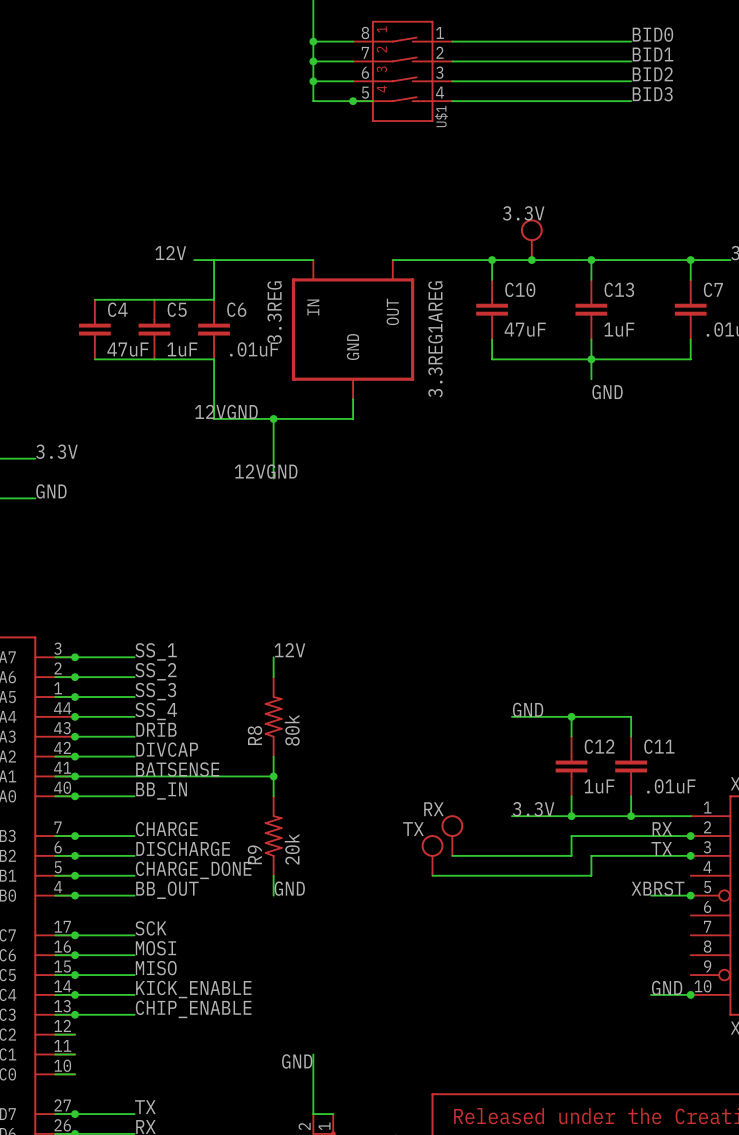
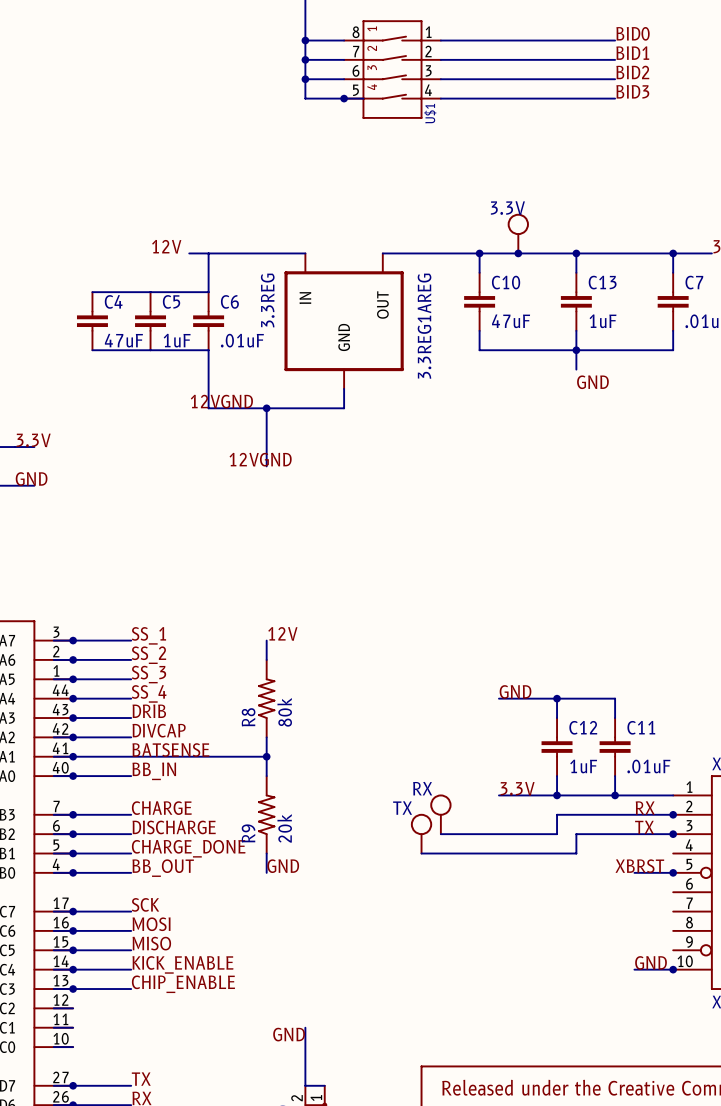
label position: 3.3V (56, 451) -> 3.3V (33, 440)
label position: GND (51, 491) -> GND (31, 479)

